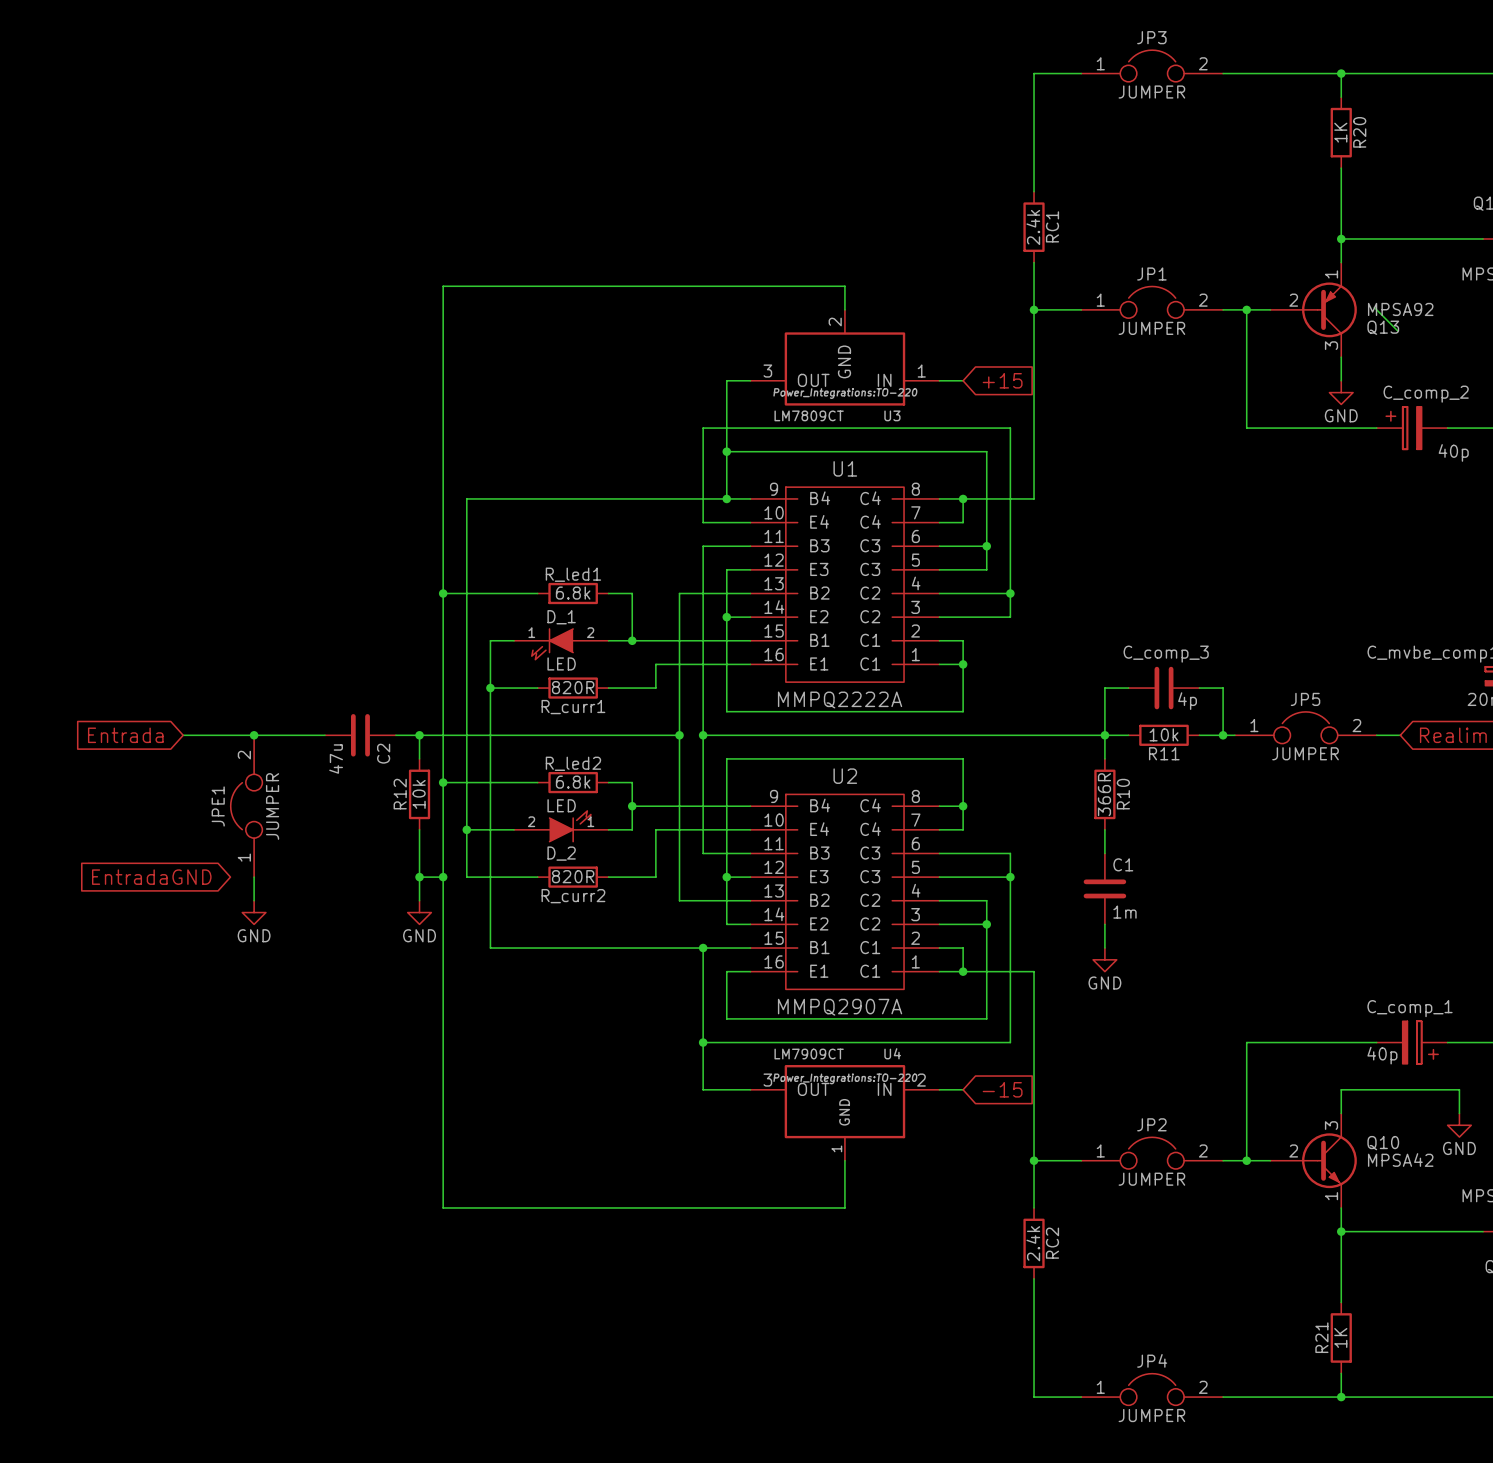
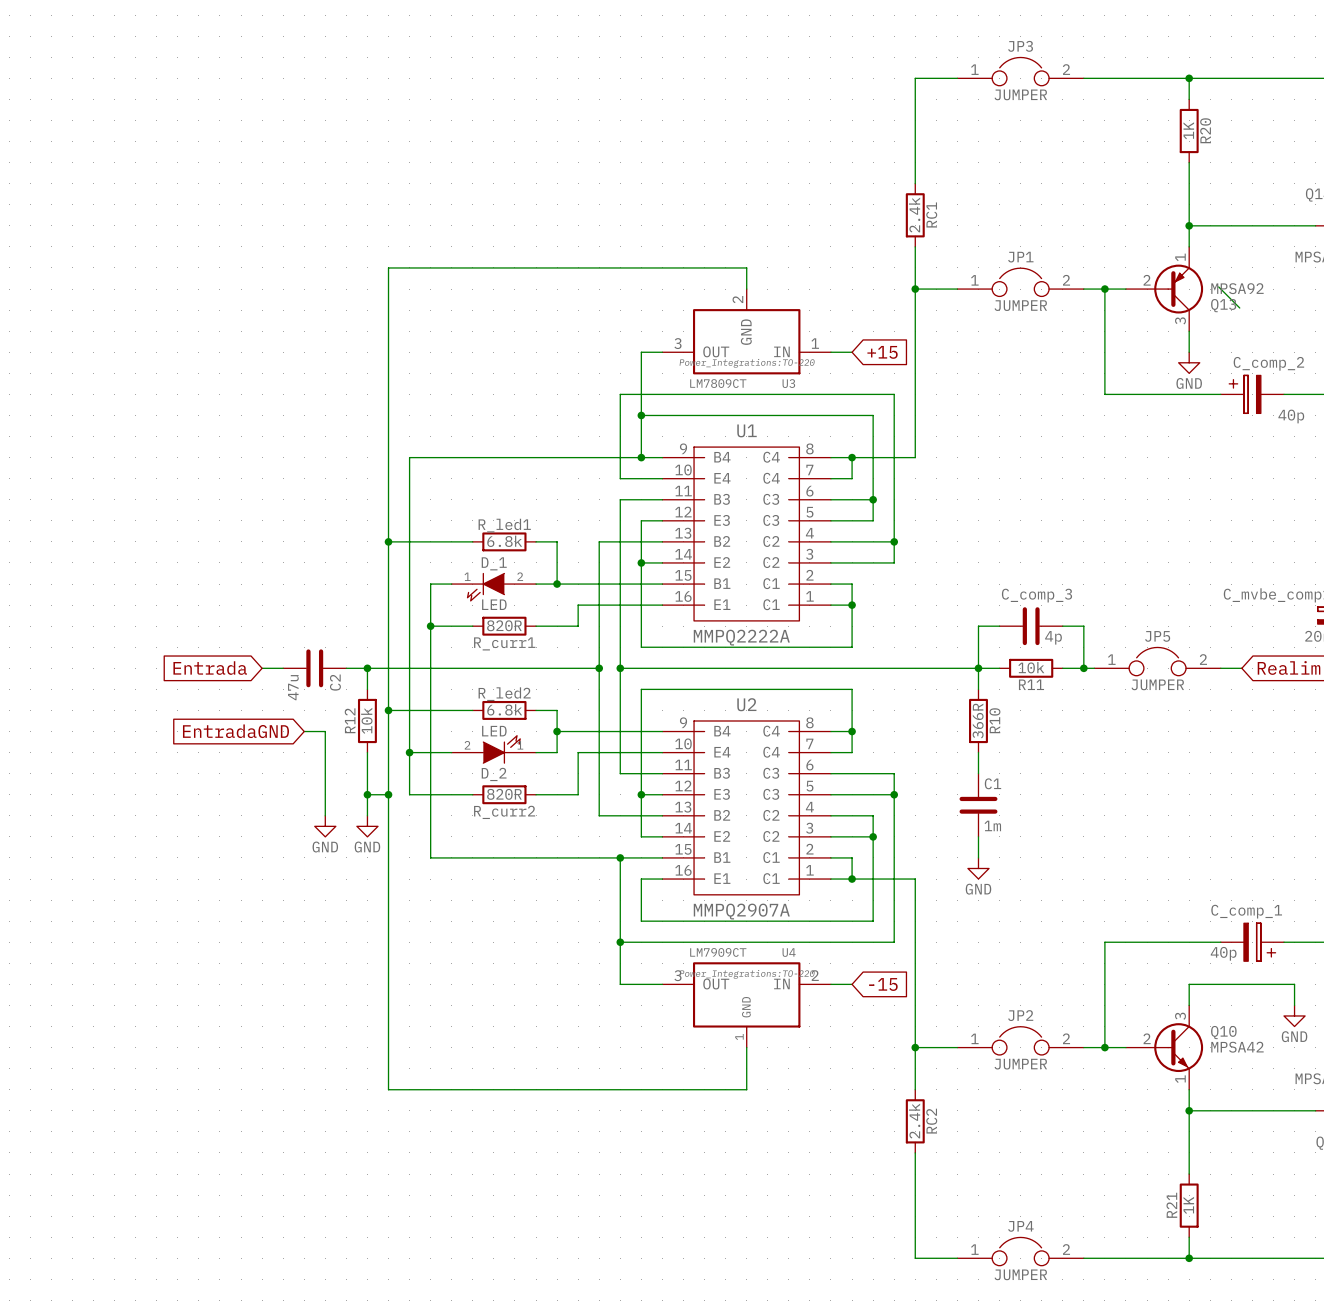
global label position: Entrada (125, 735) -> Entrada (210, 668)
wire: (183, 735) (301, 735) -> none
junction: (254, 735) -> none
JPE1: JUMPER (246, 806) -> none
wire: none -> (304, 731) (325, 731) (325, 815)
global label position: EntradaGND (151, 877) -> EntradaGND (235, 731)
wire: (254, 877) (254, 900) -> none
power symbol position: GND (254, 912) -> GND (325, 826)

